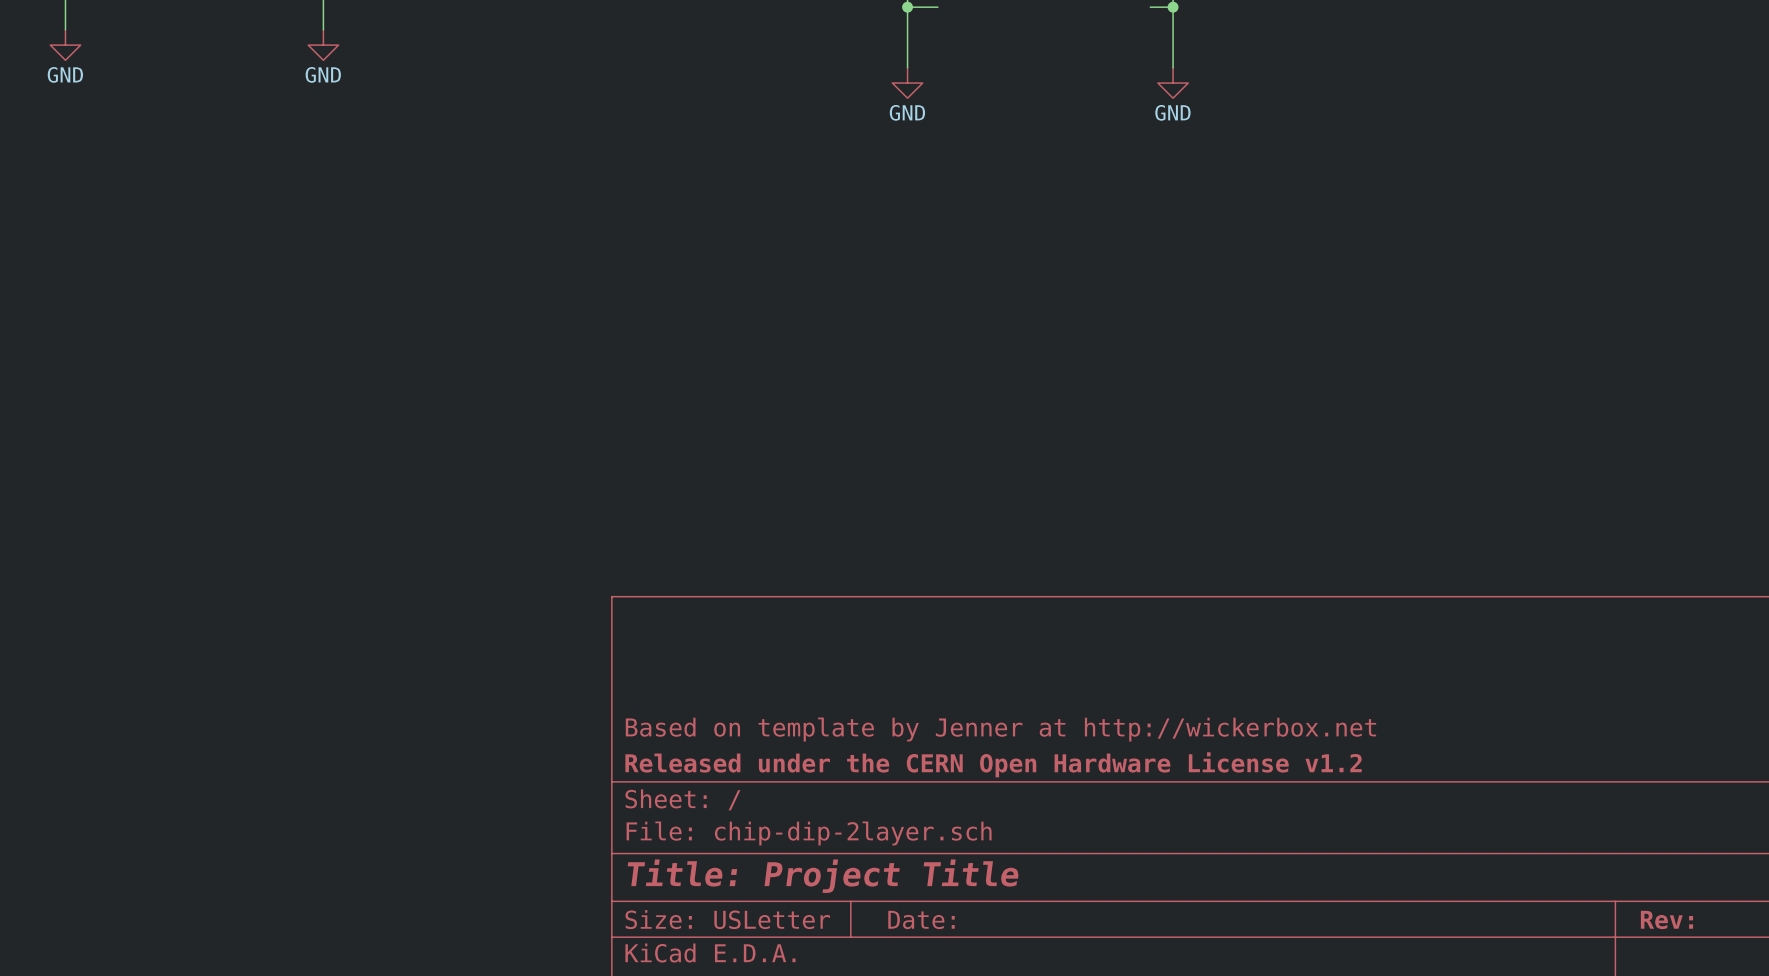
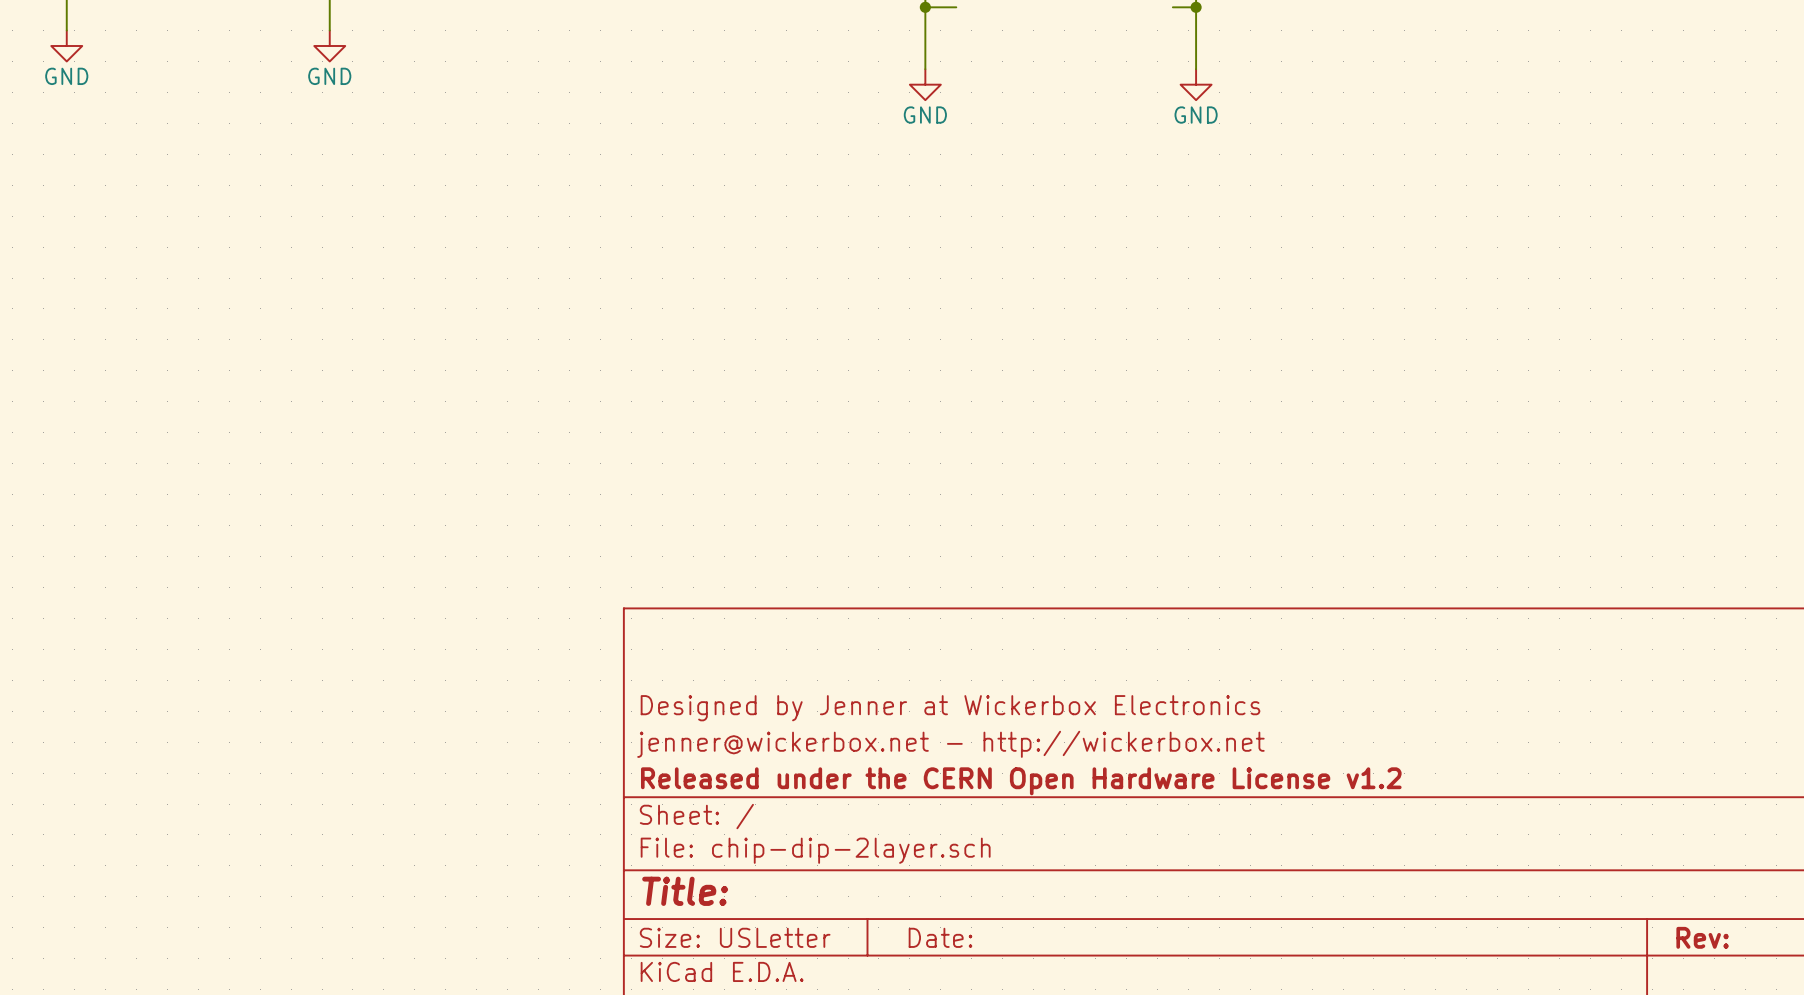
title block: none -> Designed by Jenner at Wickerbox Electronics (950, 708)
title block: Based on template by Jenner at http://wickerbox.net (1000, 729) -> jenner@wickerbox.net - http://wickerbox.net (950, 744)
title block: Title: Project Title (823, 876) -> Title: (685, 891)

